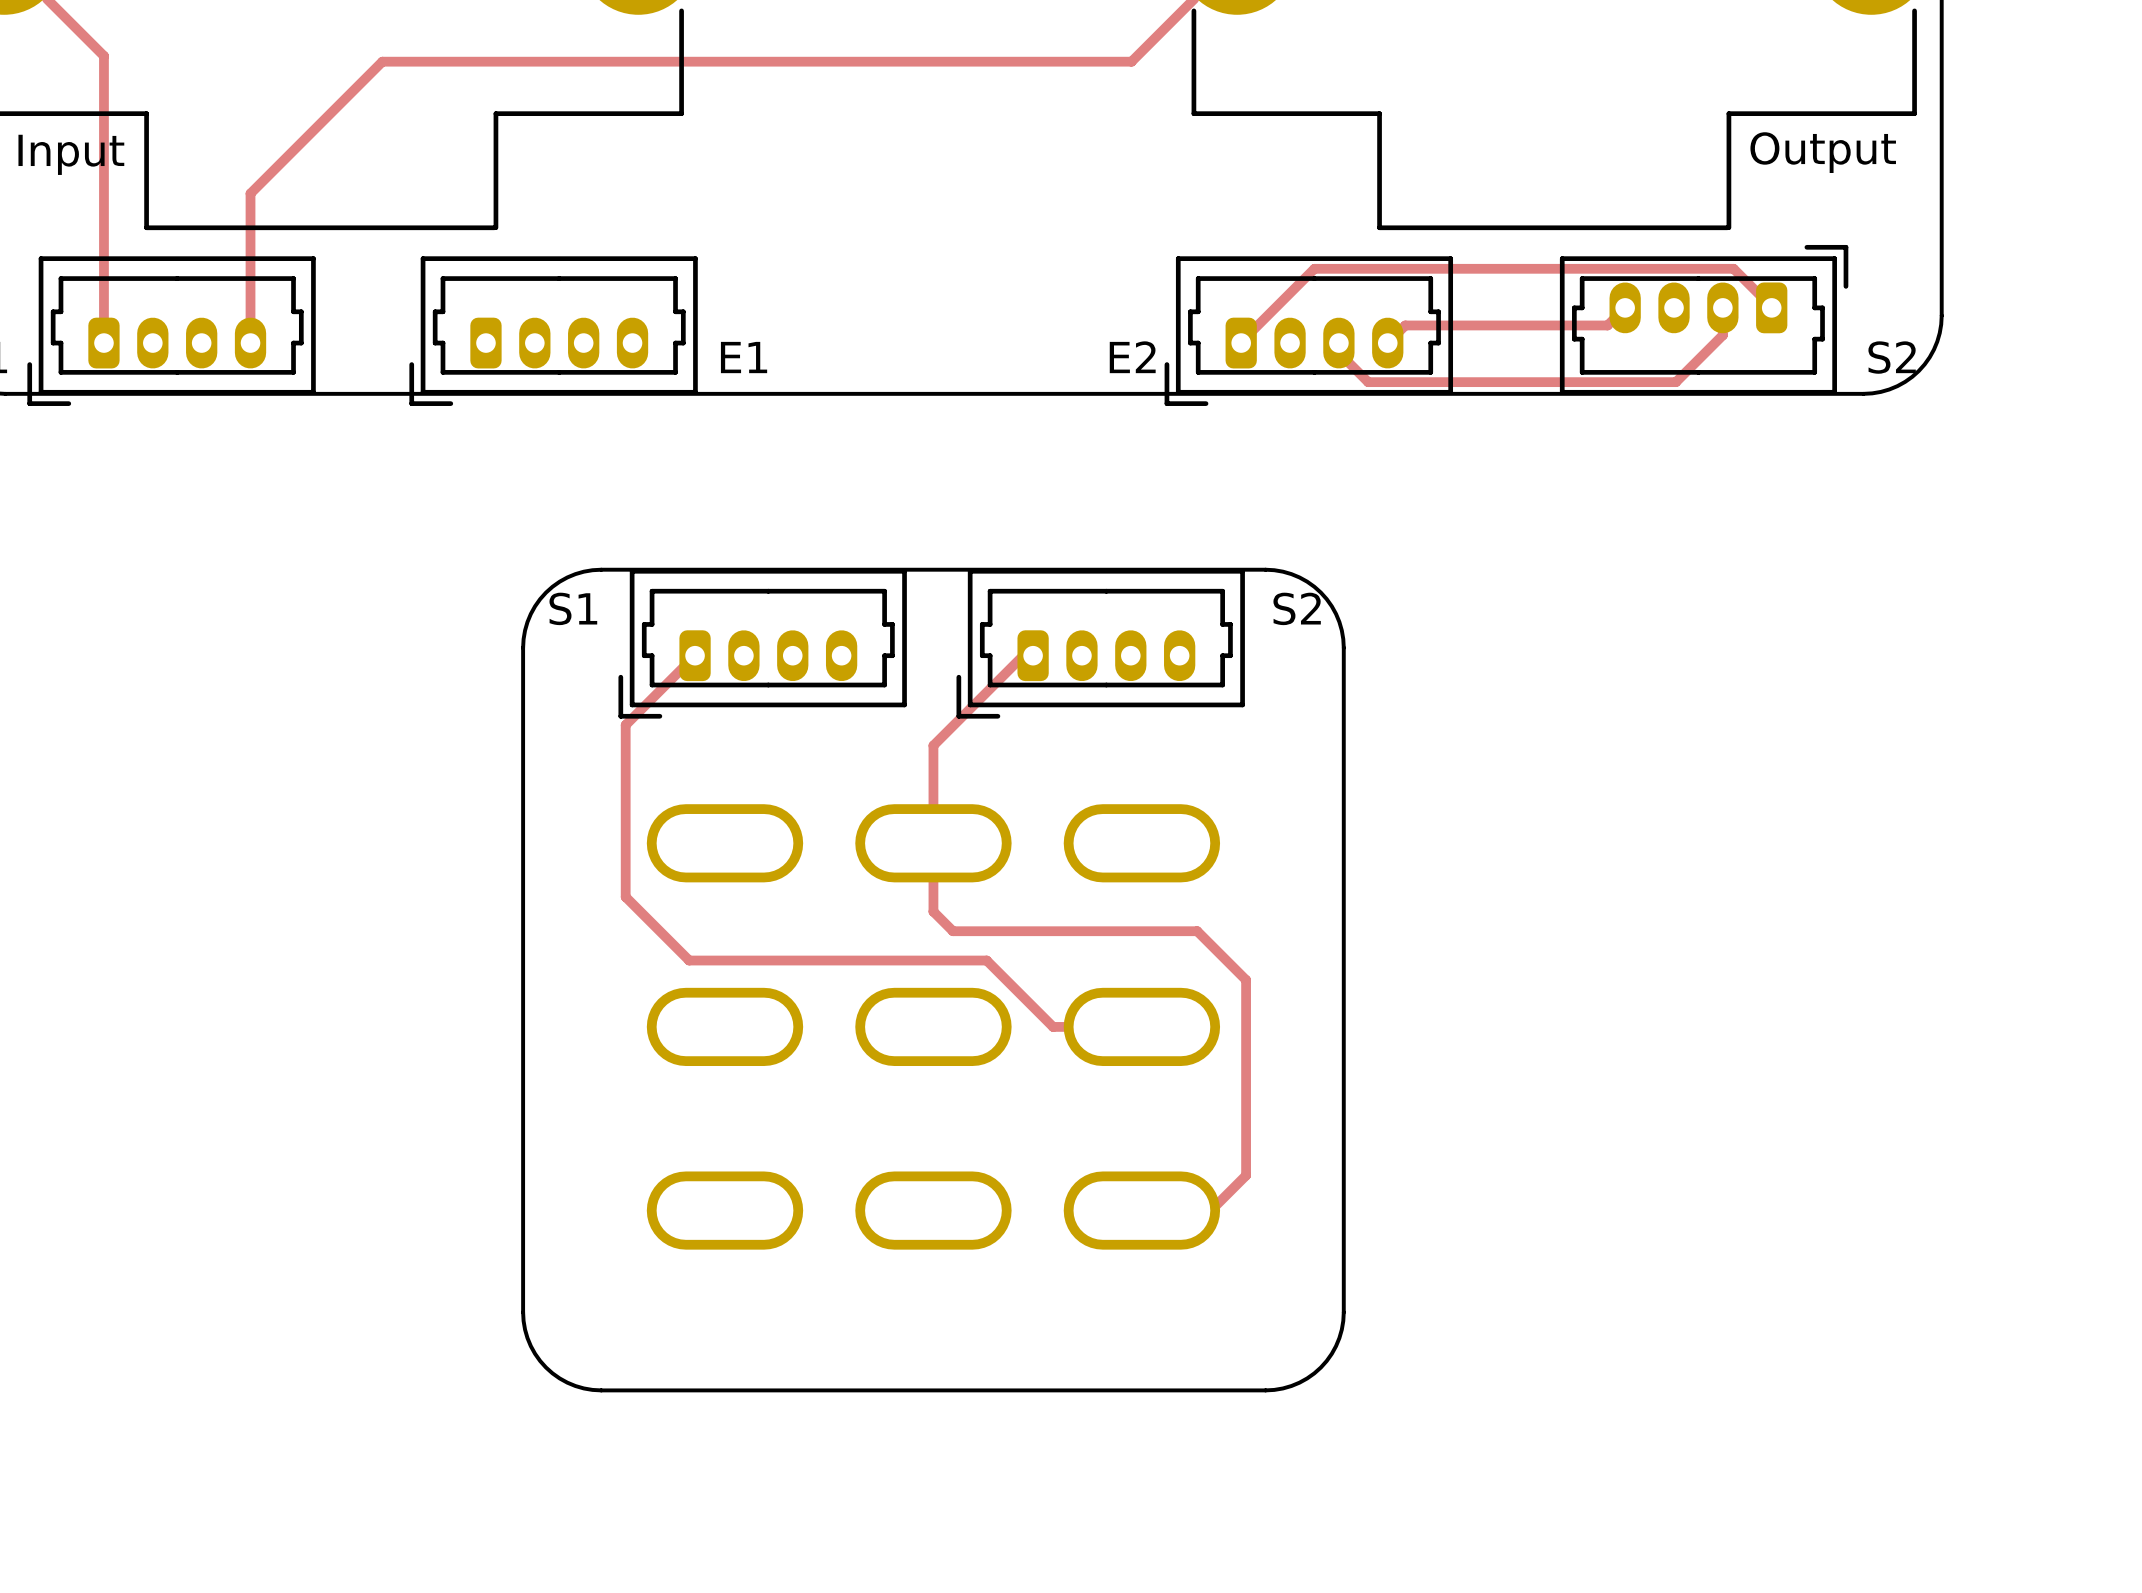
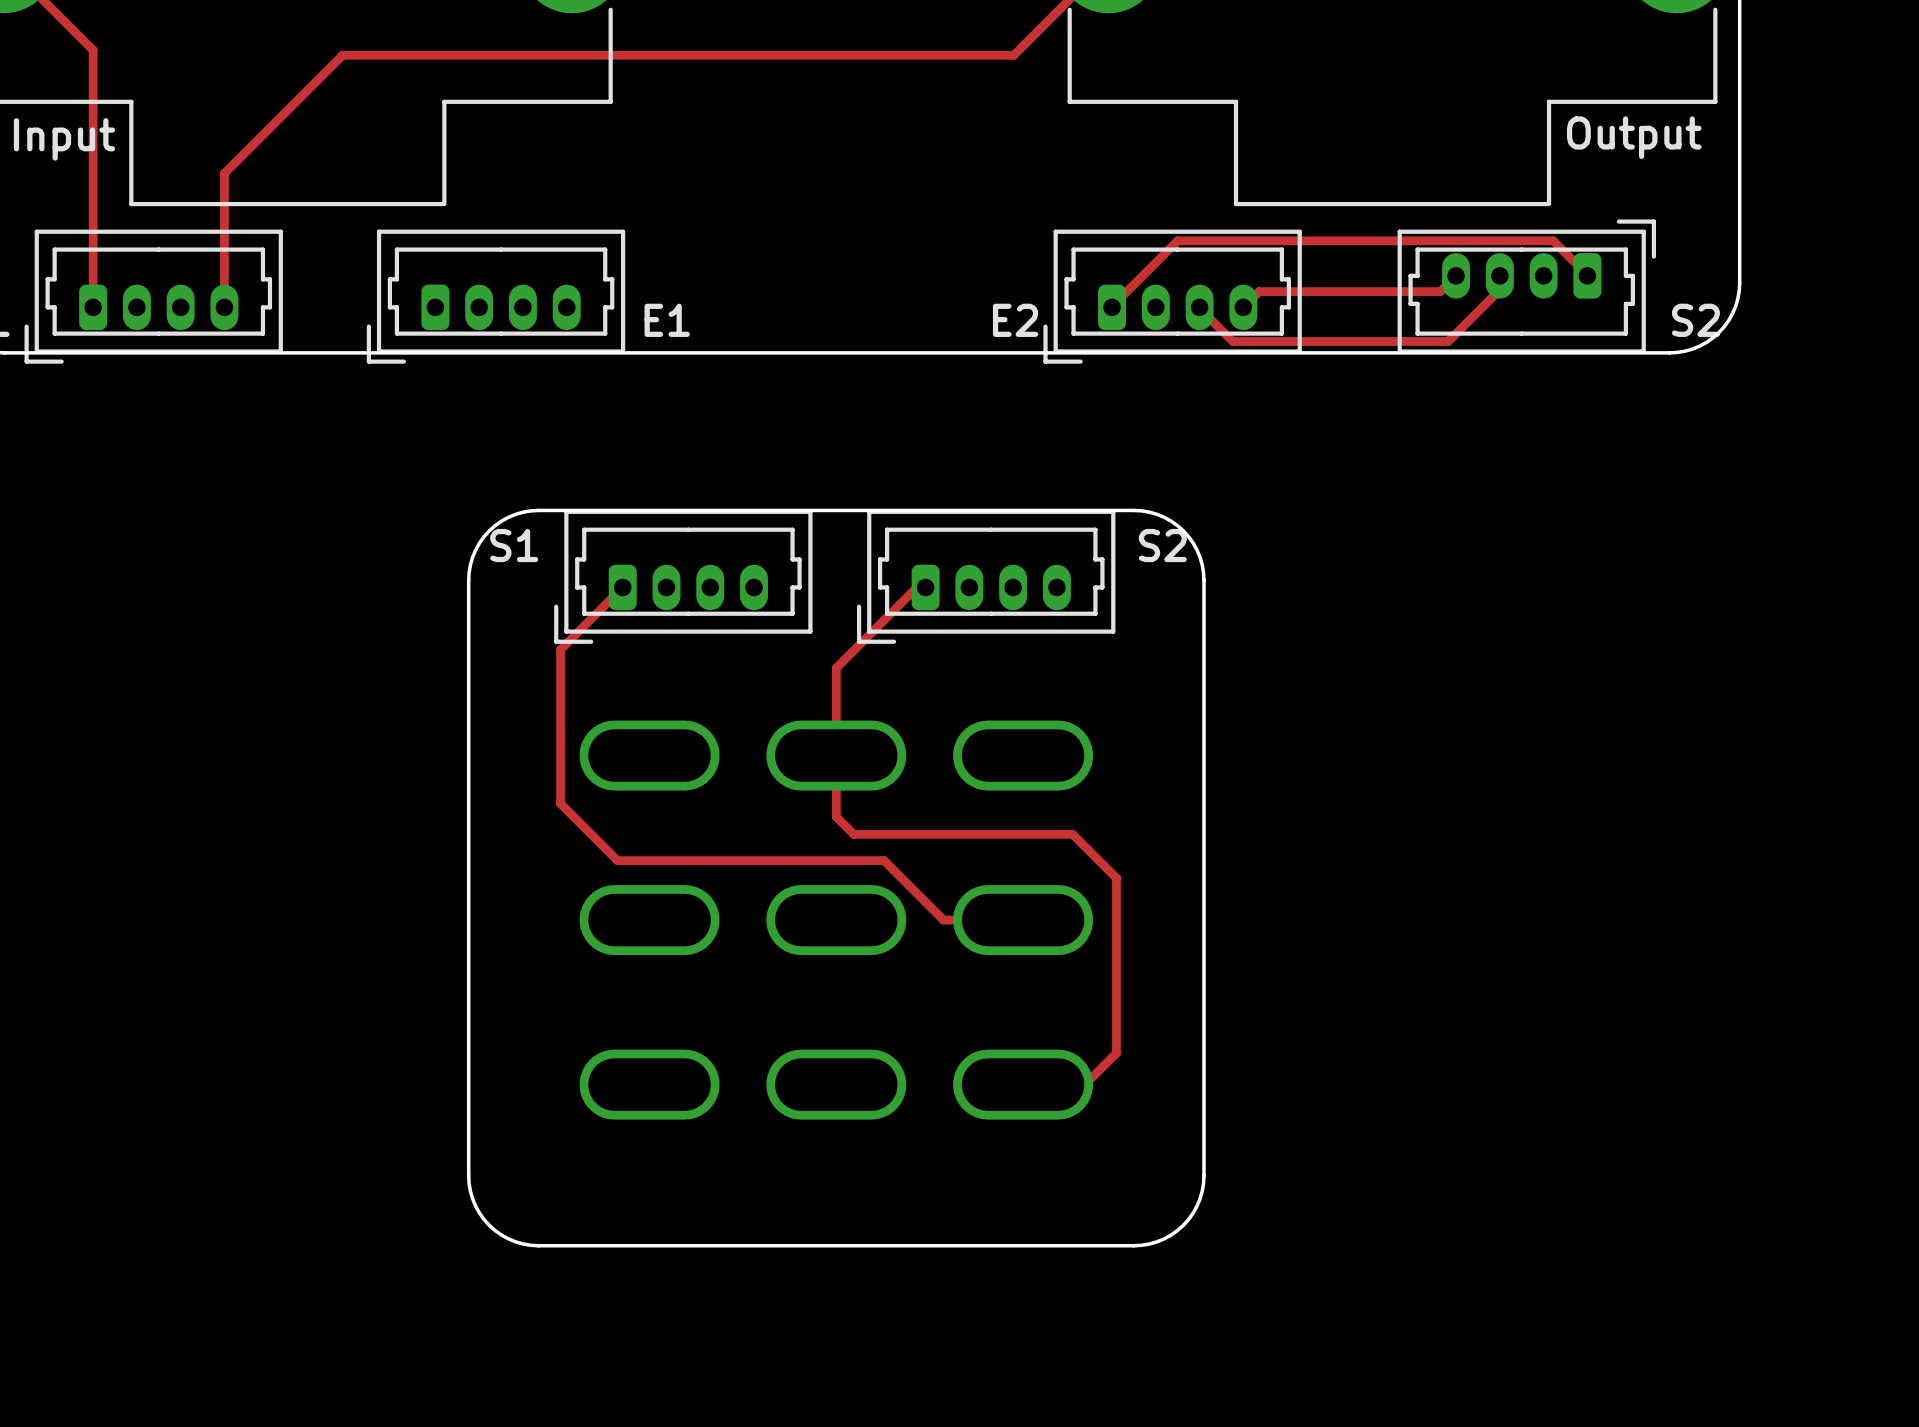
track: (1722, 307) (1722, 335) (1675, 382) (1368, 382) (1338, 352) (1338, 344) -> (1499, 275) (1499, 289) (1448, 341) (1232, 341) (1199, 308)

